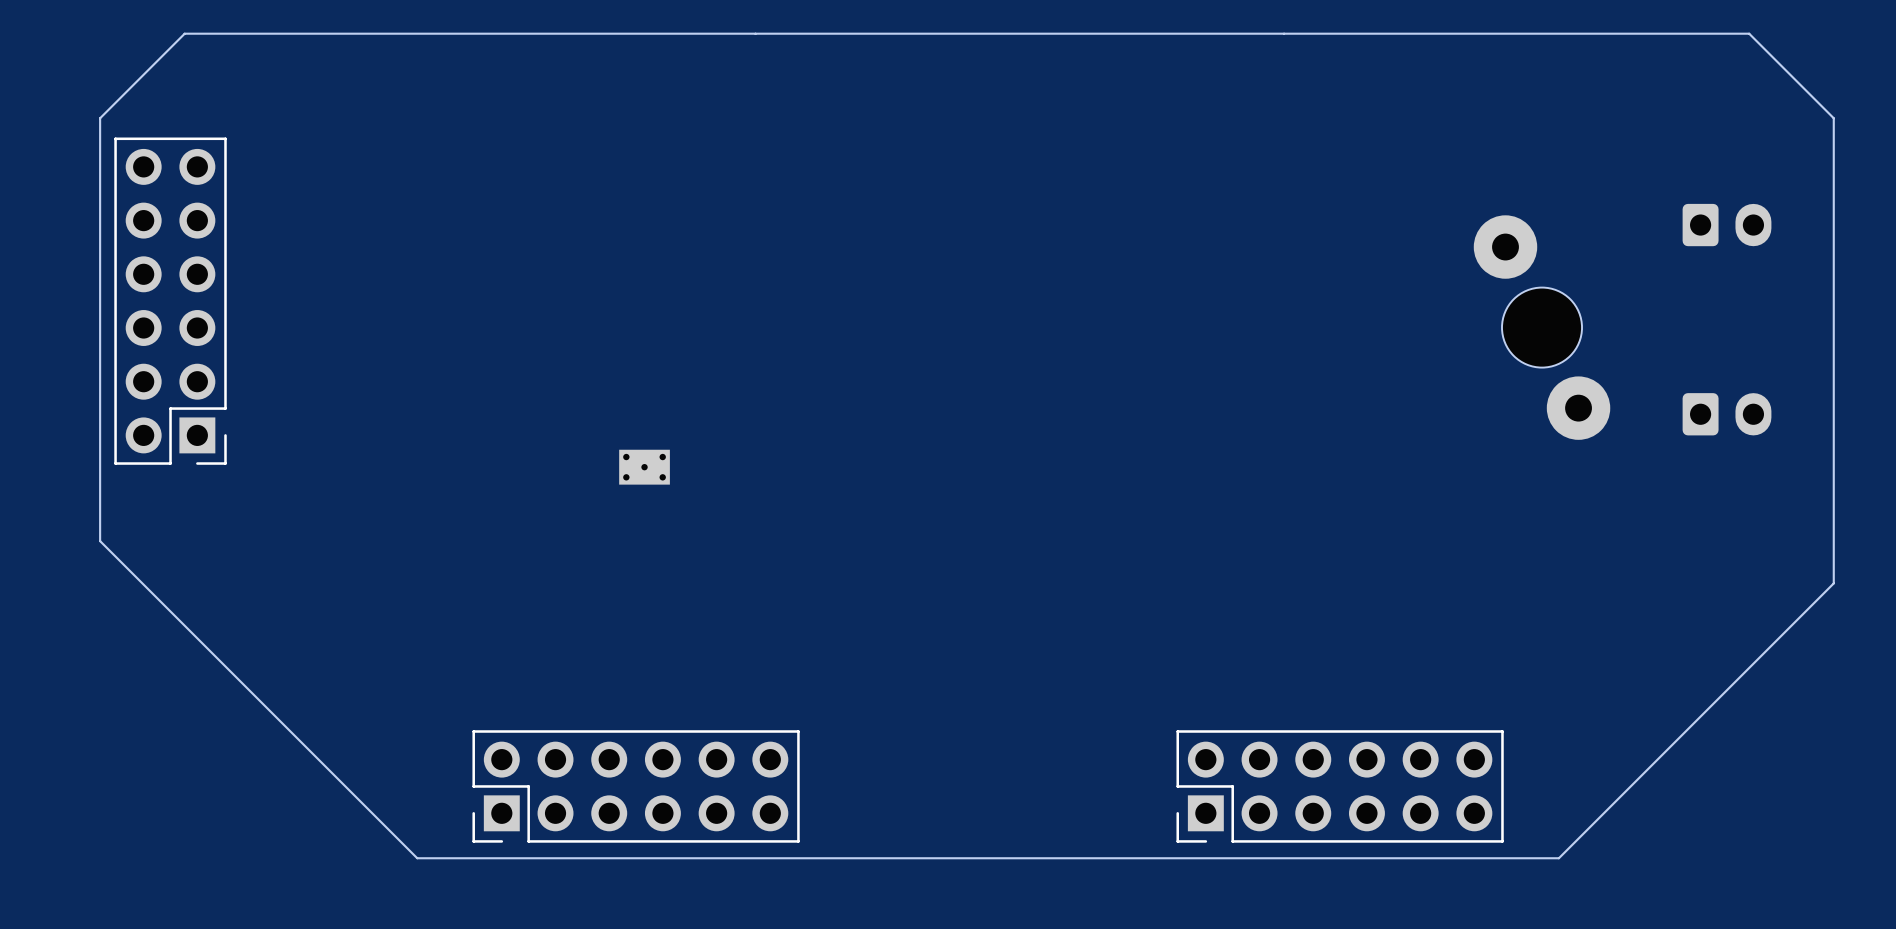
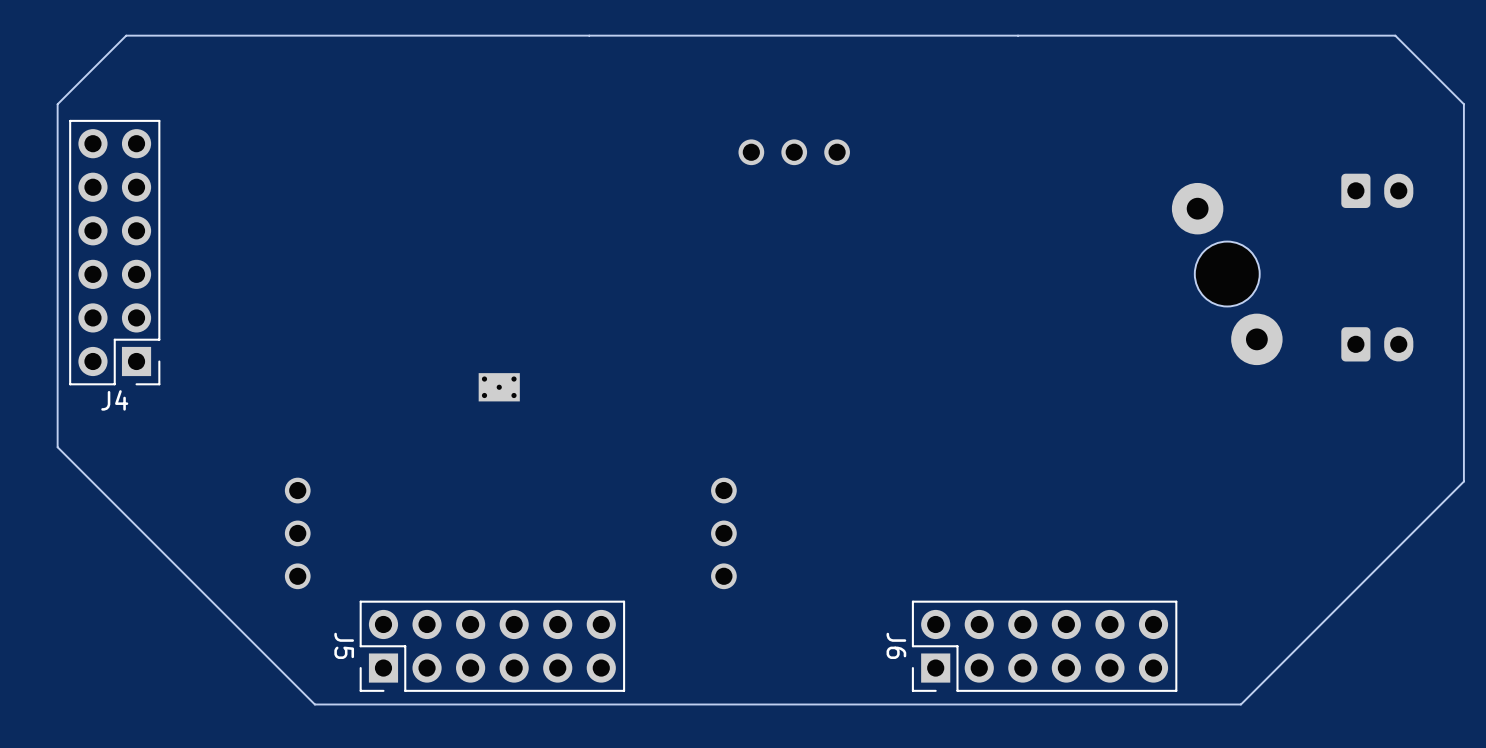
part: none -> (794, 152)
J4 name: none -> J4 (114, 400)
part: none -> (297, 533)
part: none -> (723, 533)
J5 name: none -> J5 (344, 645)
J6: none -> (1044, 646)
part: (1340, 786) -> none

